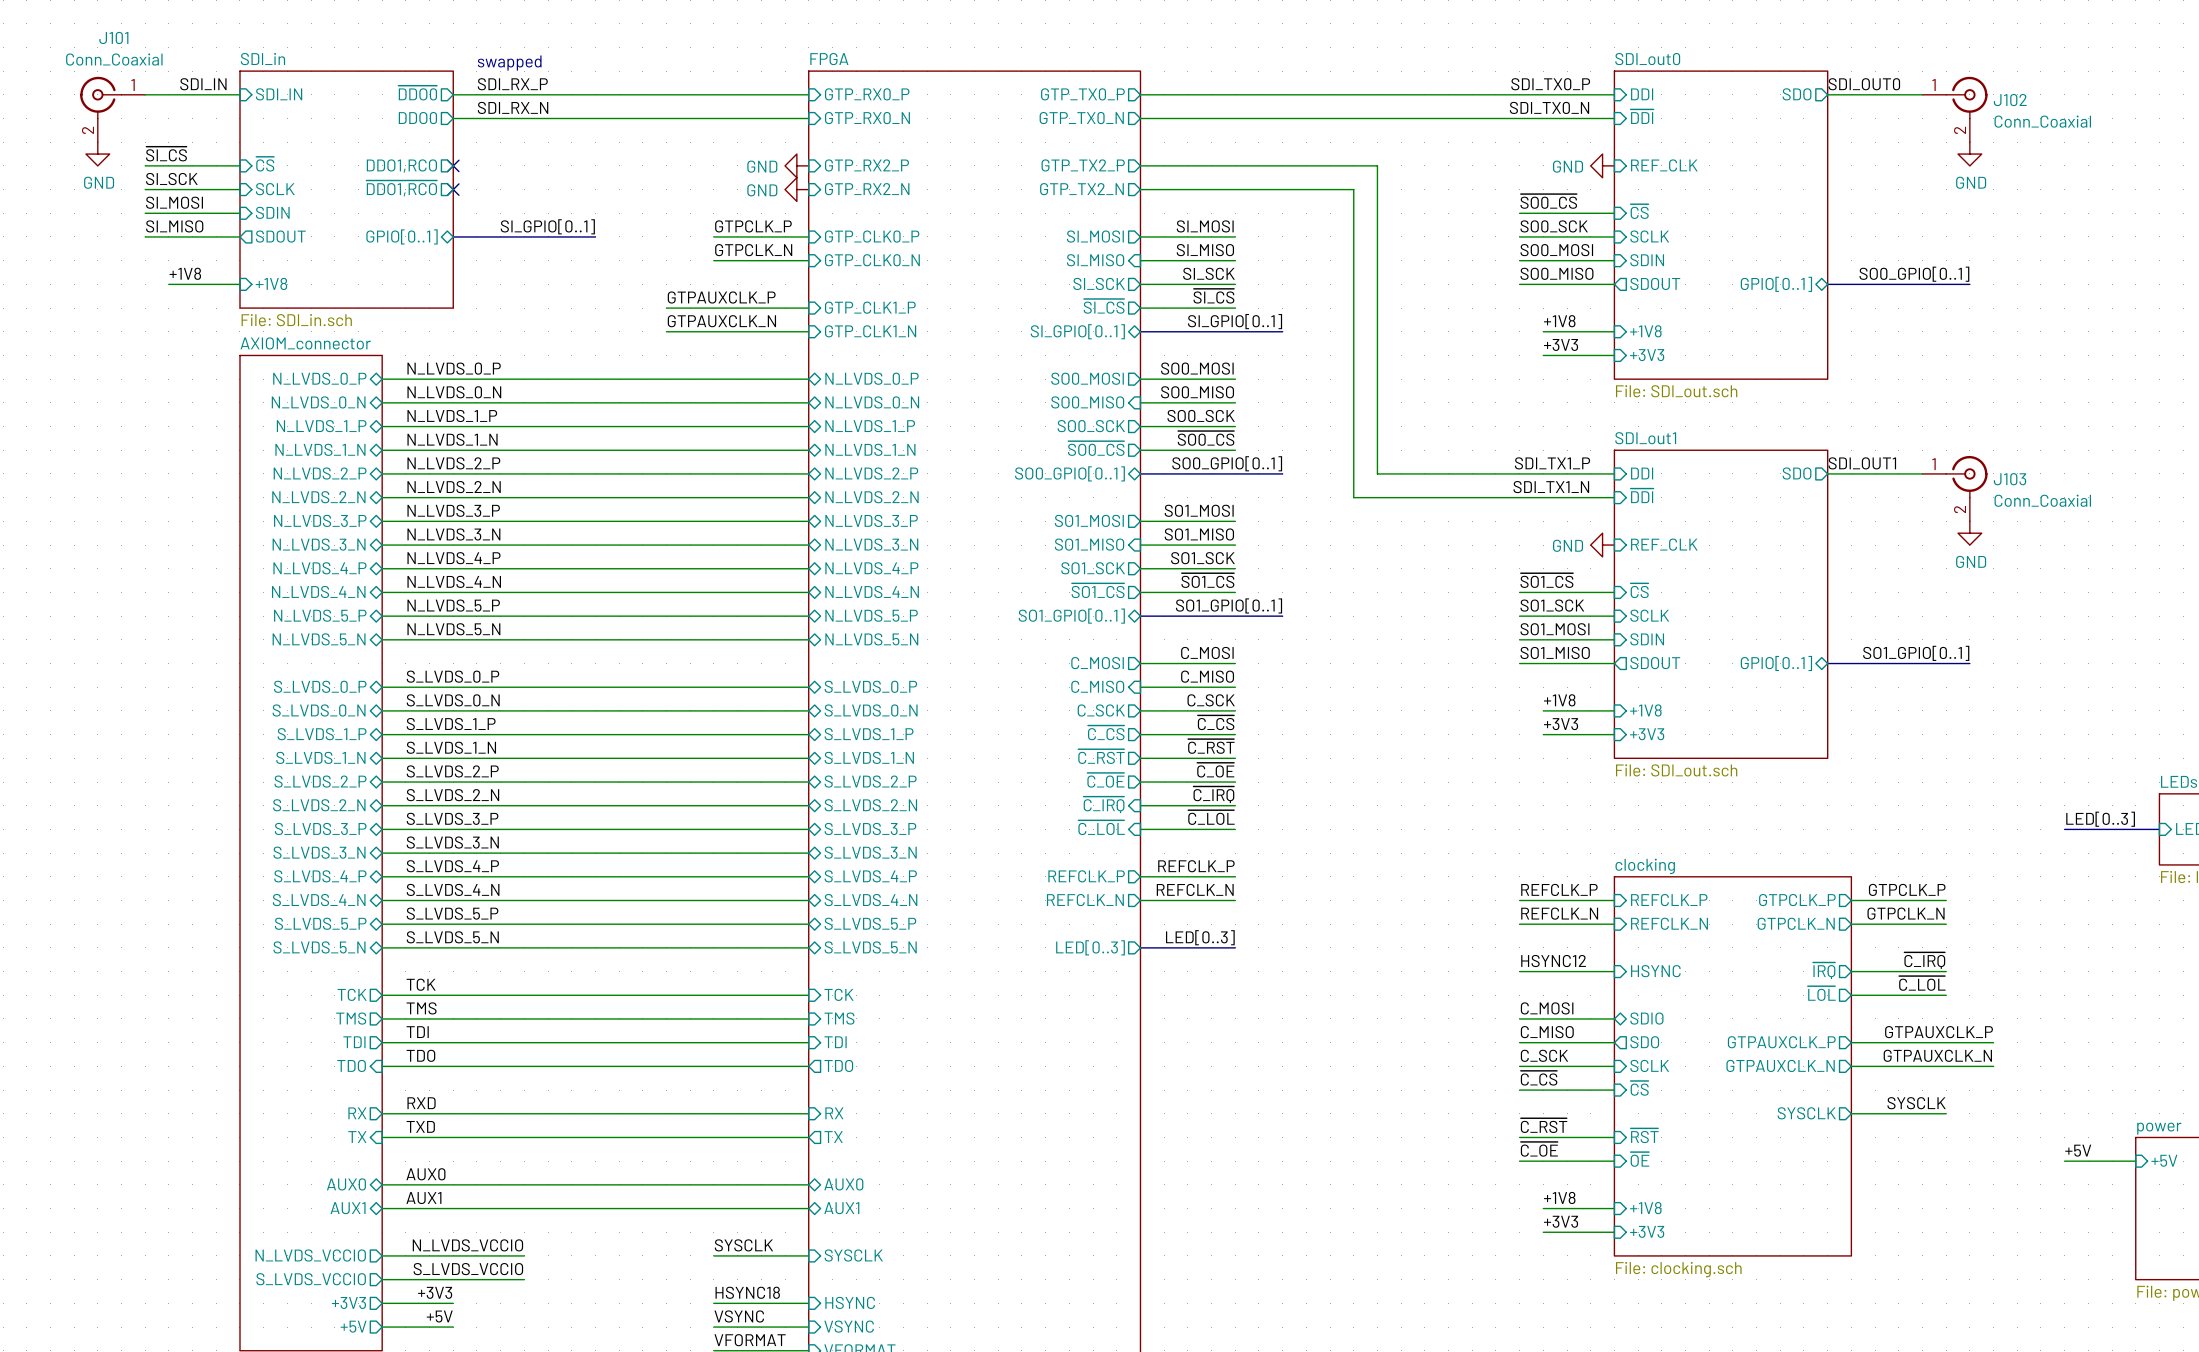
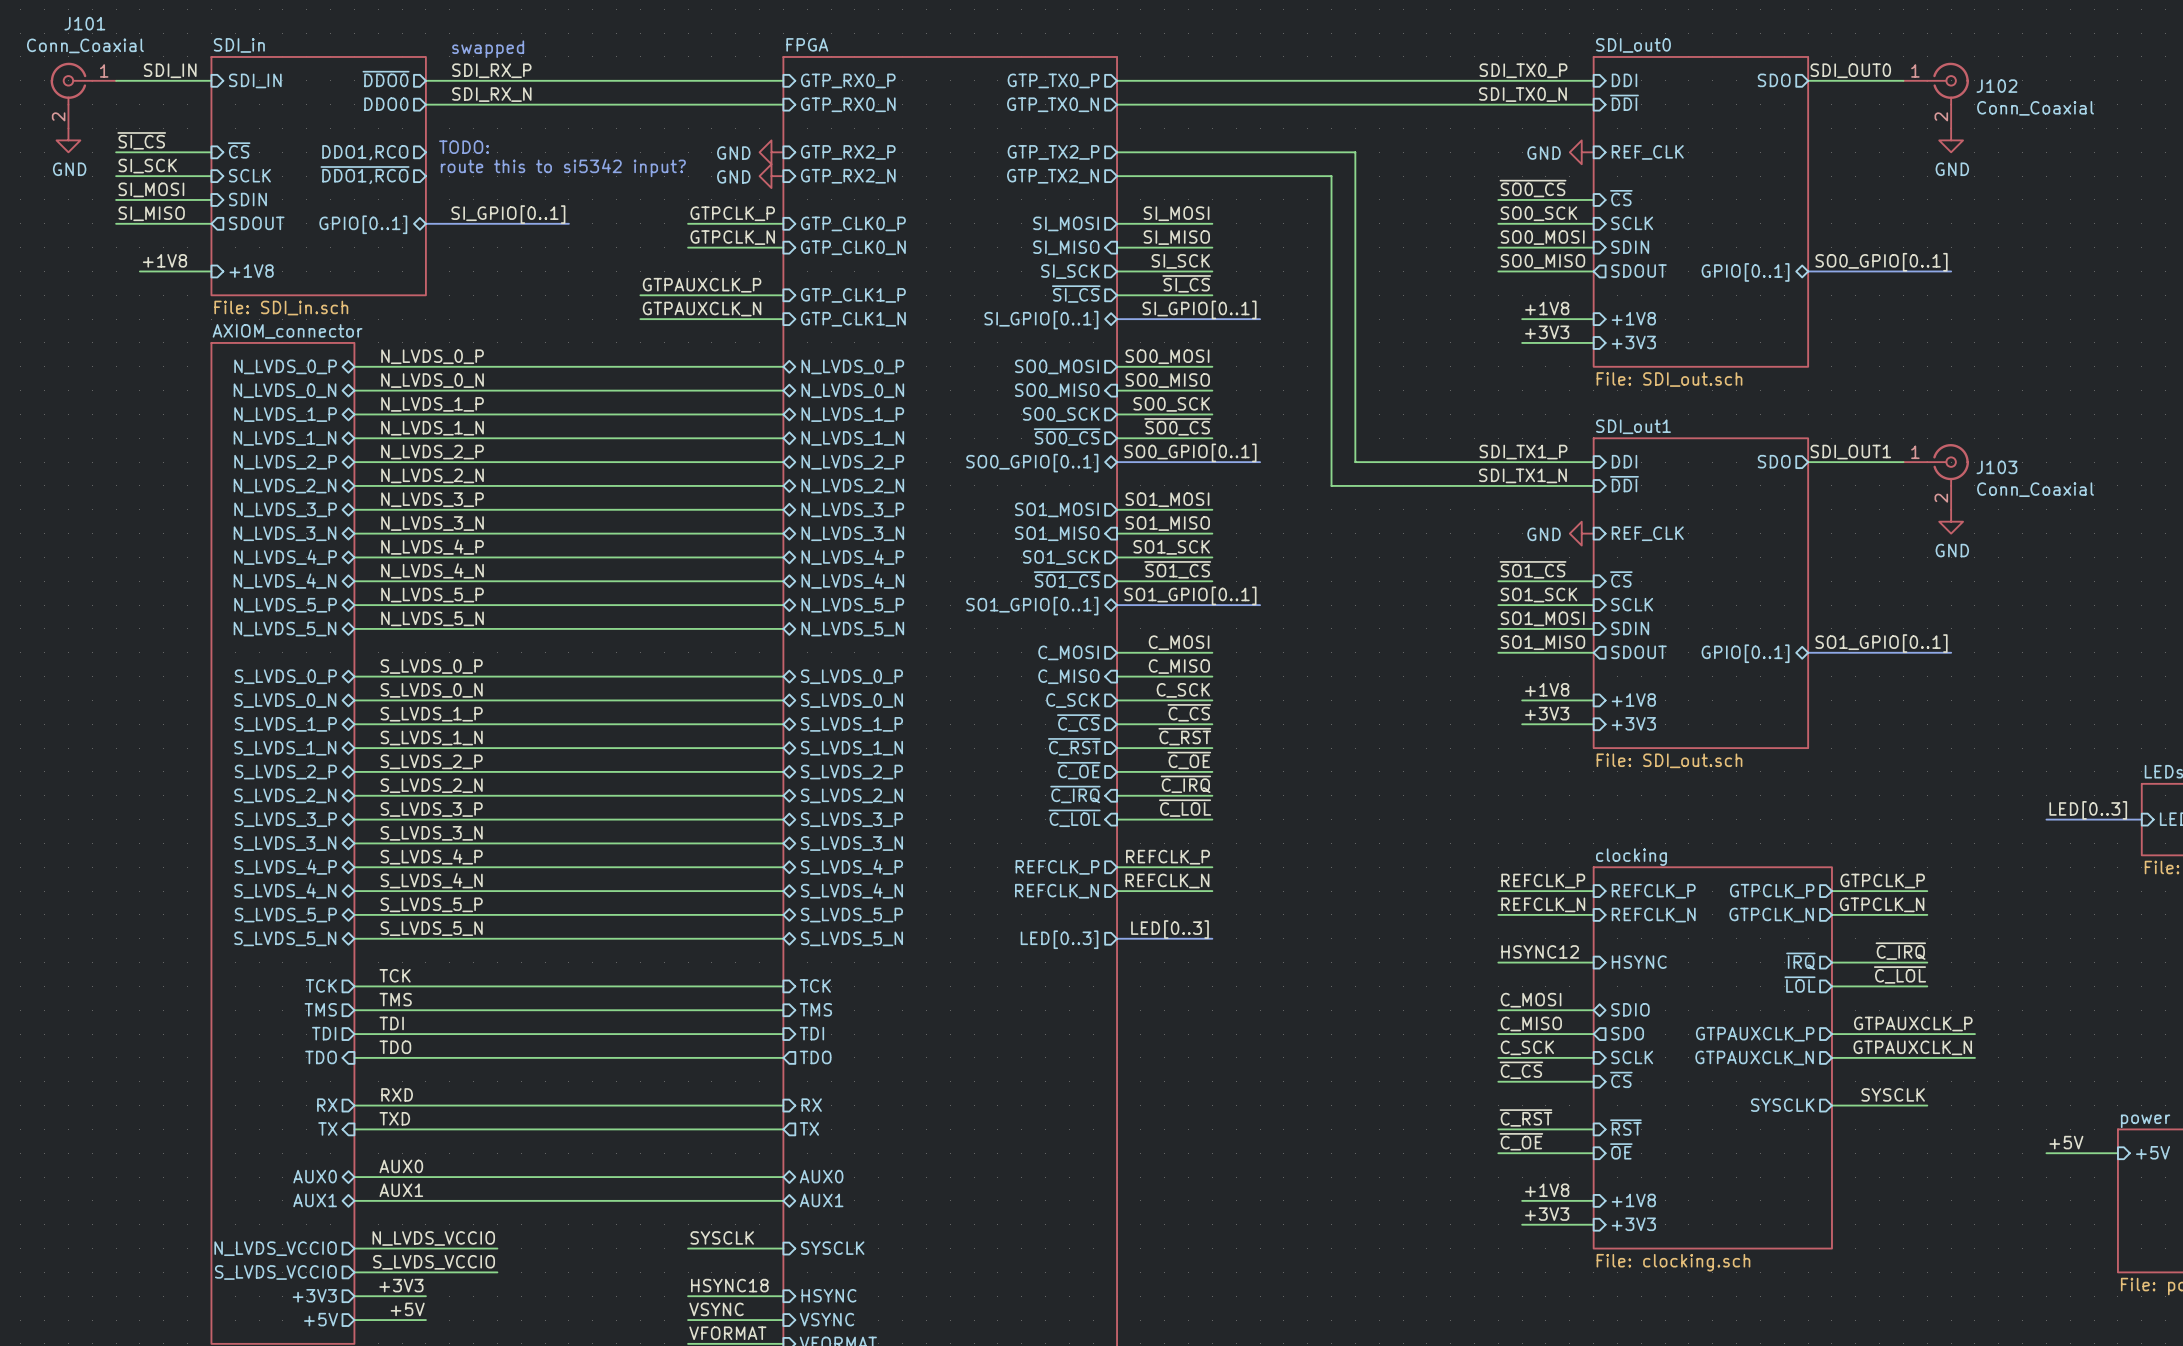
text: none -> TODO: (464, 147)
no-connect mark: (453, 165) -> none
text: none -> route this to si5342 input? (563, 168)
no-connect mark: (453, 189) -> none

